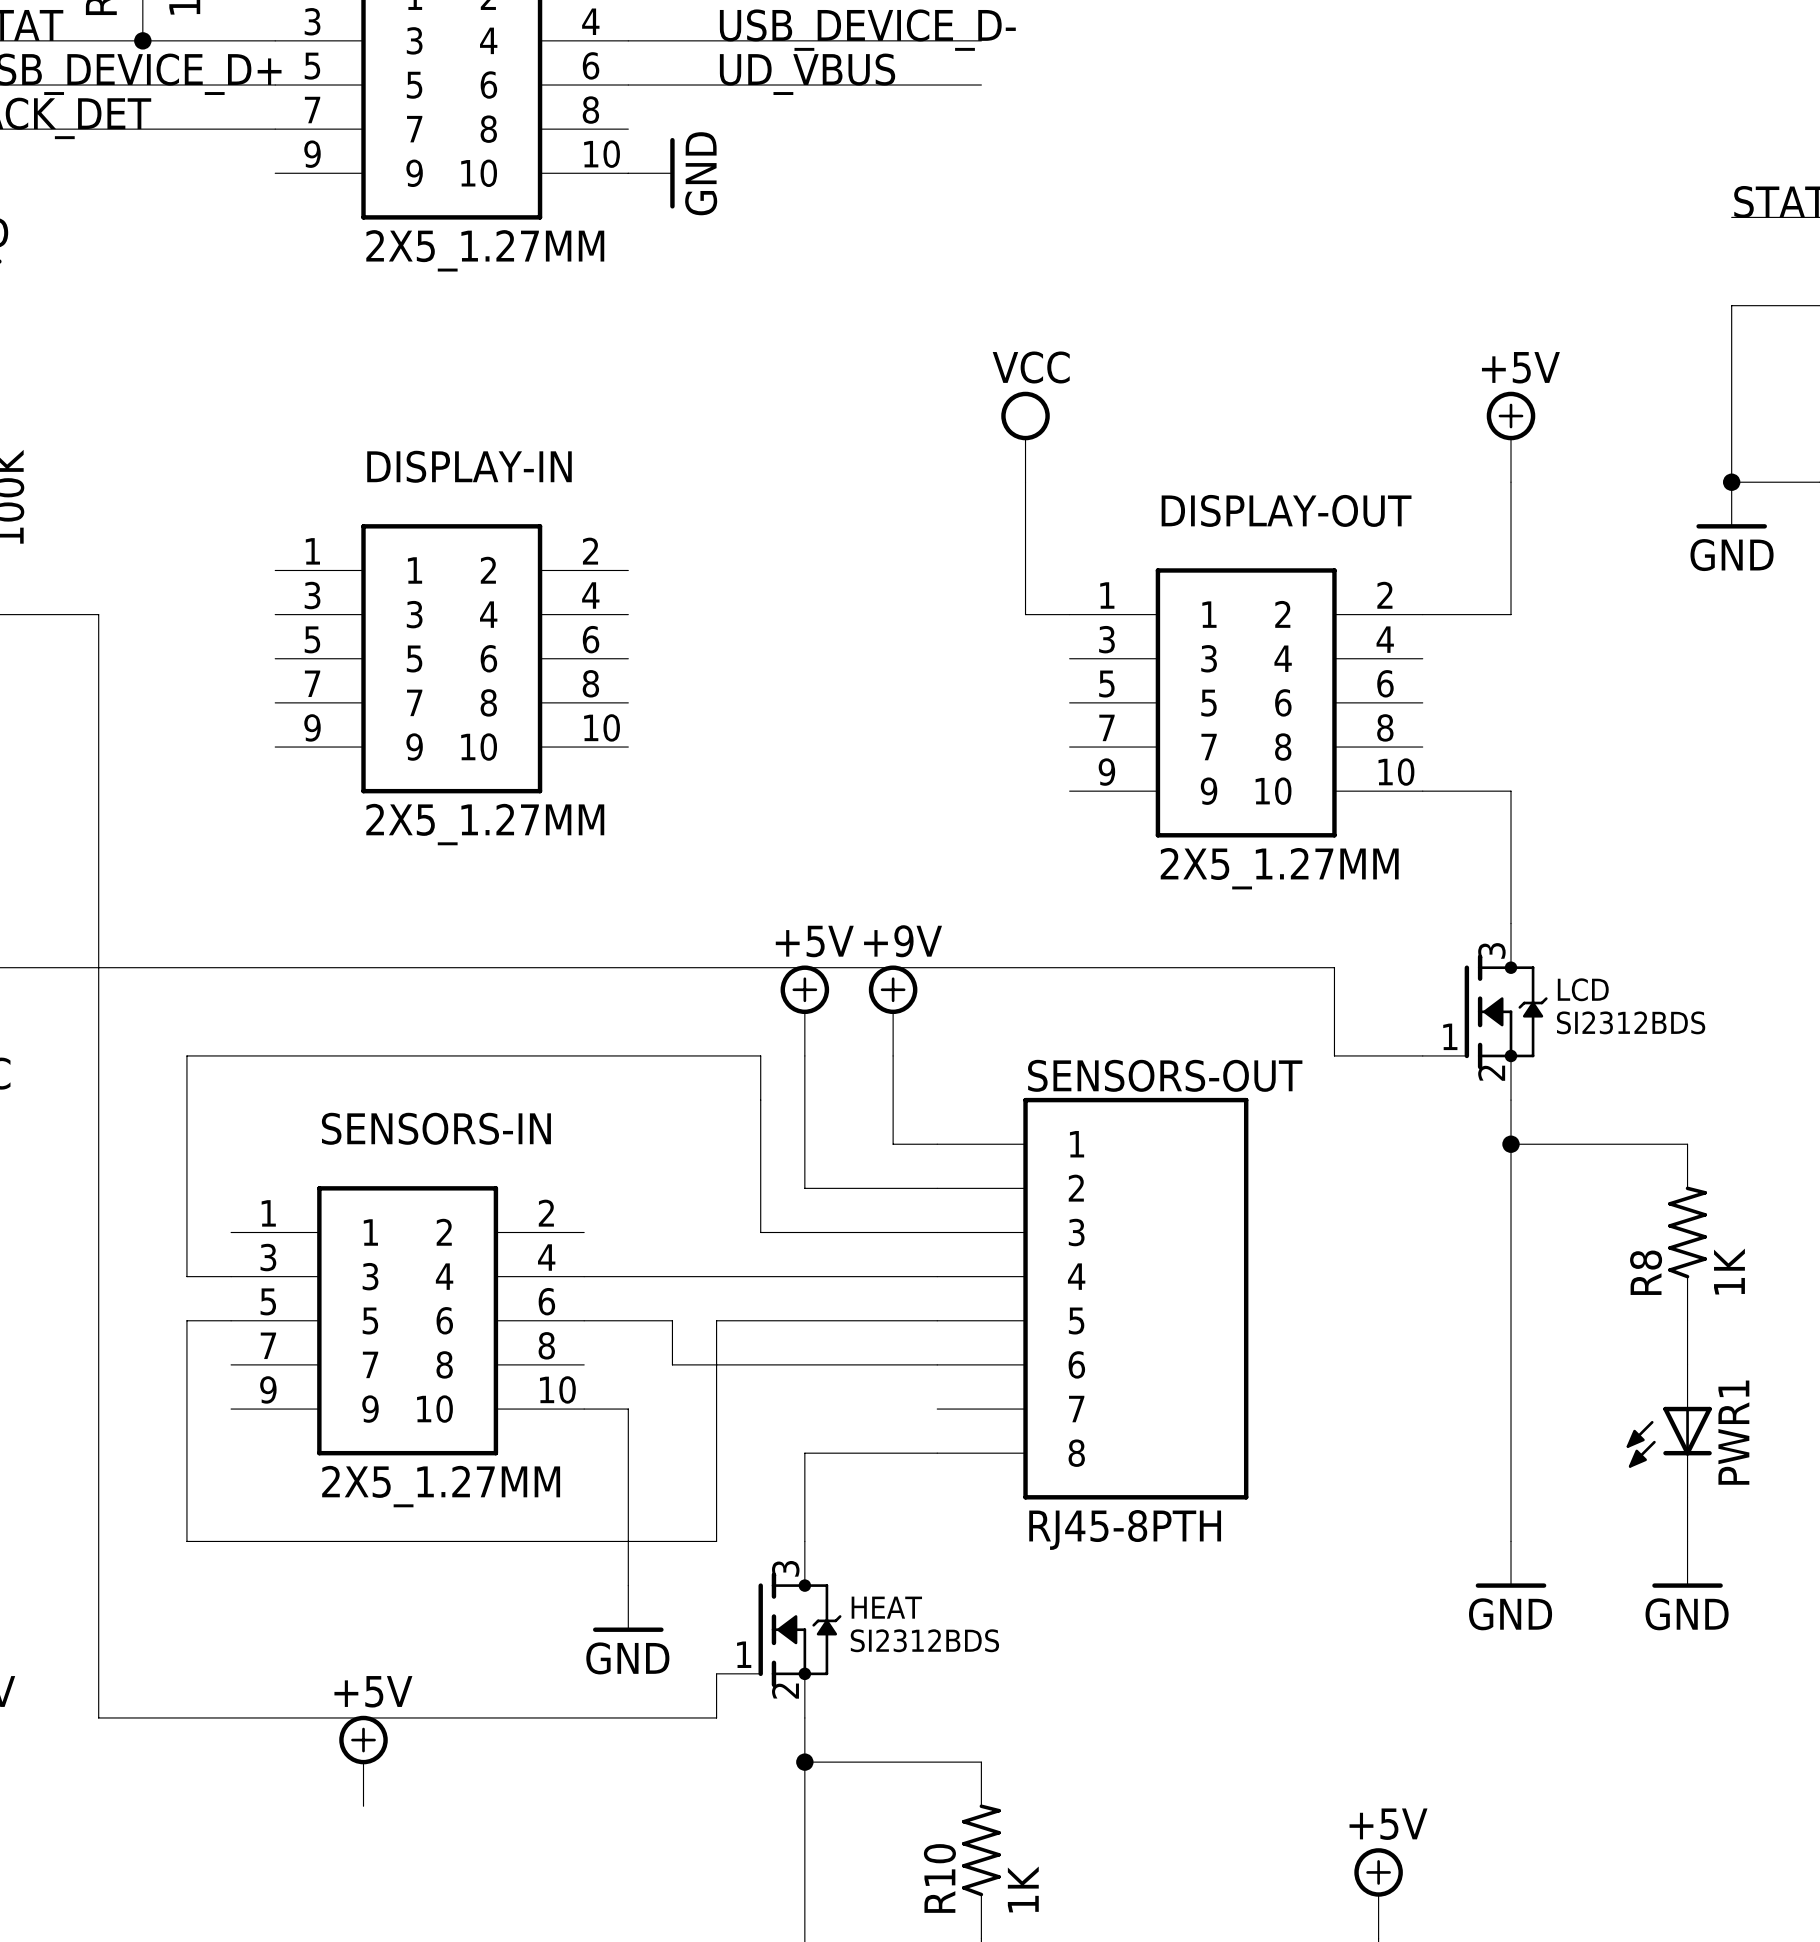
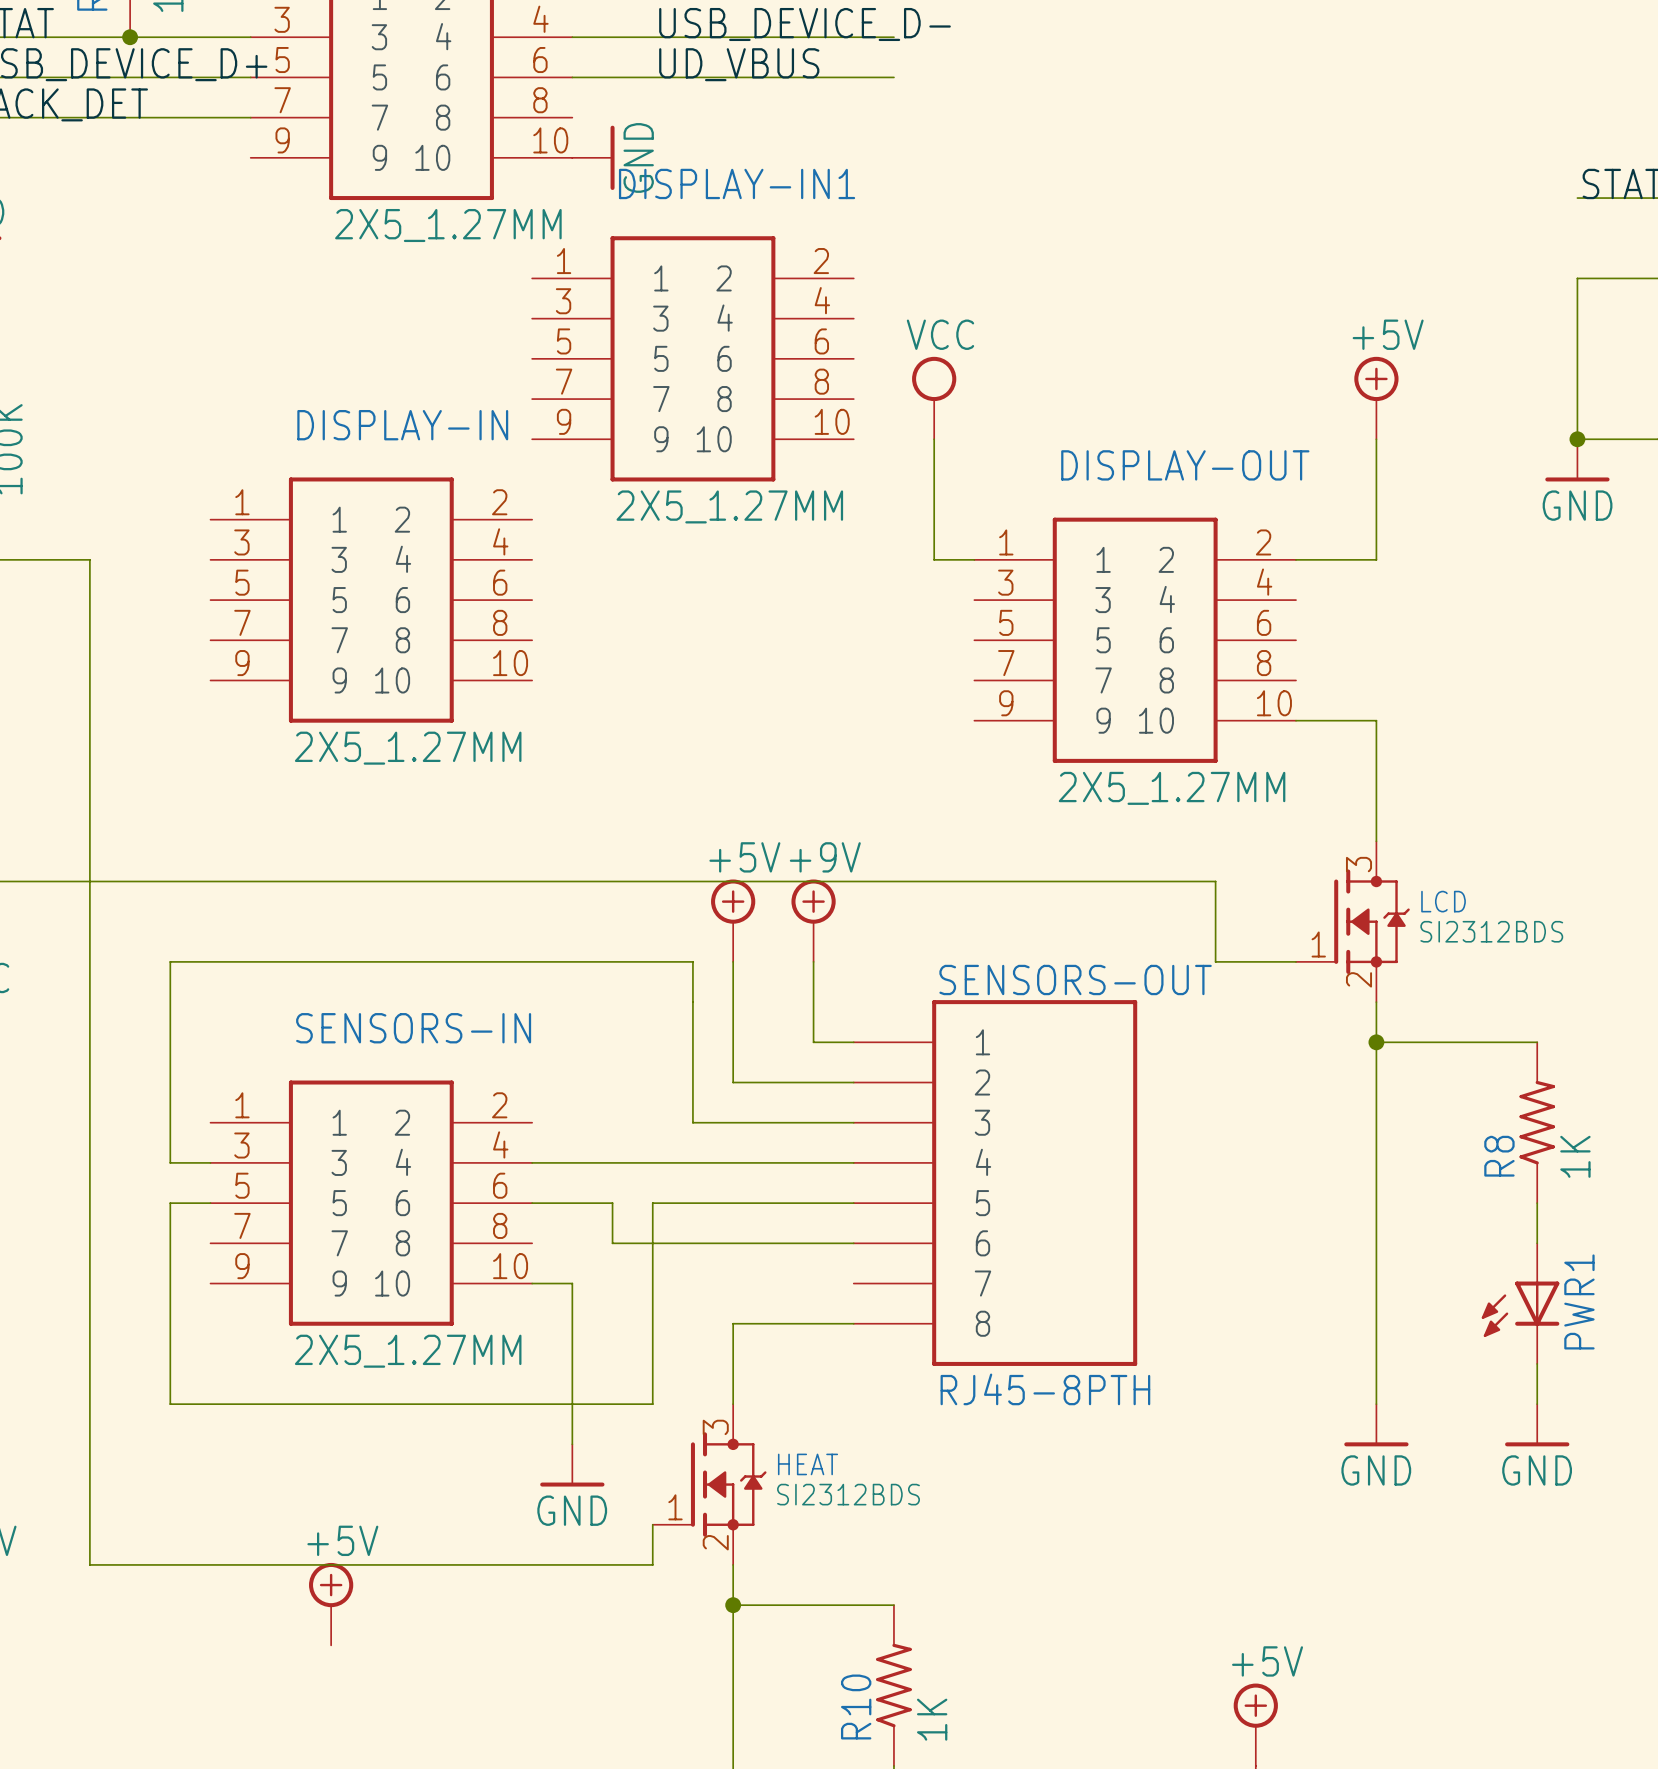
DISPLAY-IN1: none -> 2X5_1.27MM (692, 358)
DISPLAY-IN position: (451, 658) -> (371, 600)

